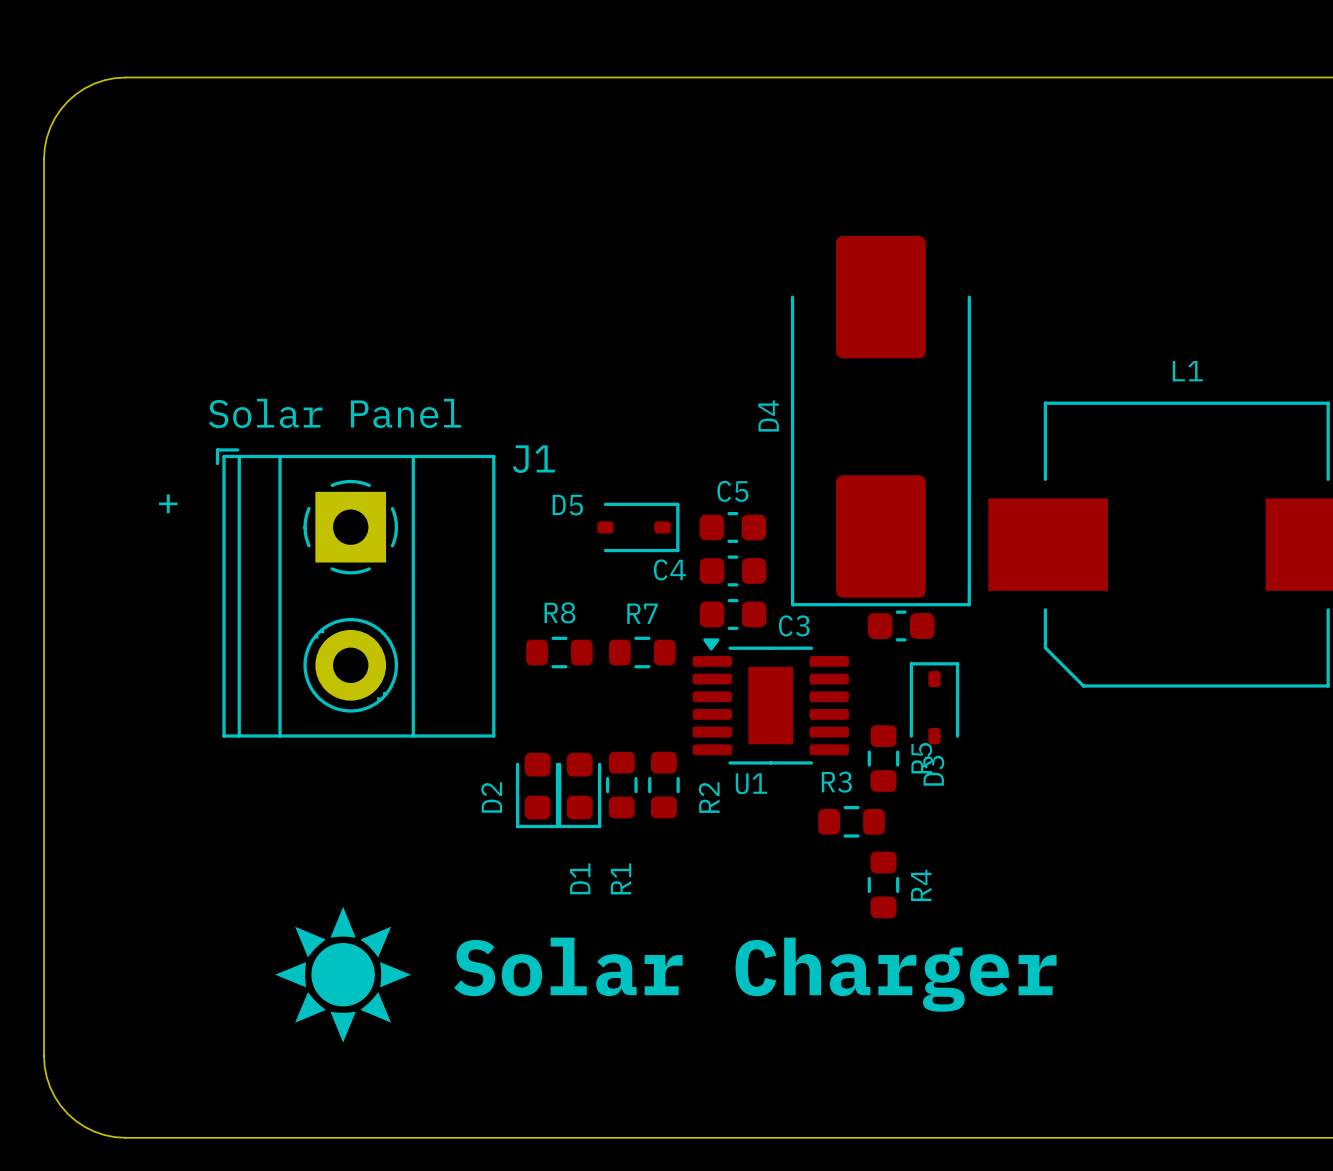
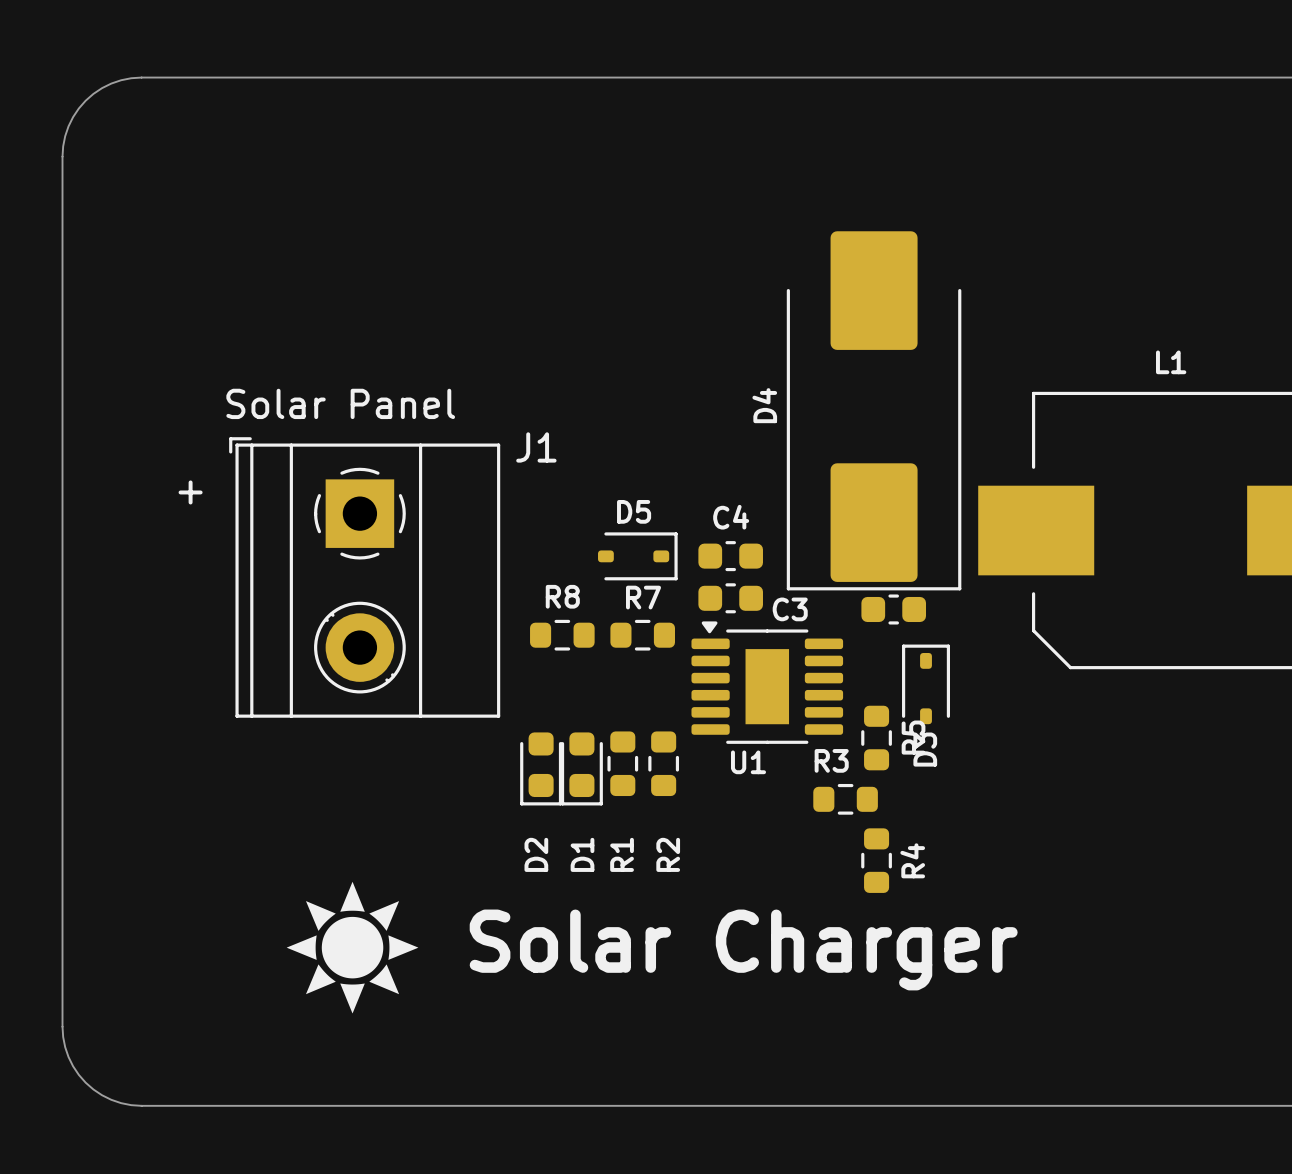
D5 name position: D5 (567, 505) -> D5 (634, 511)
D5 position: (638, 527) -> (637, 556)
C5: (732, 527) -> none
C4 name position: C4 (669, 569) -> C4 (731, 517)
D2 name position: D2 (491, 797) -> D2 (536, 854)
R2 name position: R2 (709, 797) -> R2 (668, 854)

